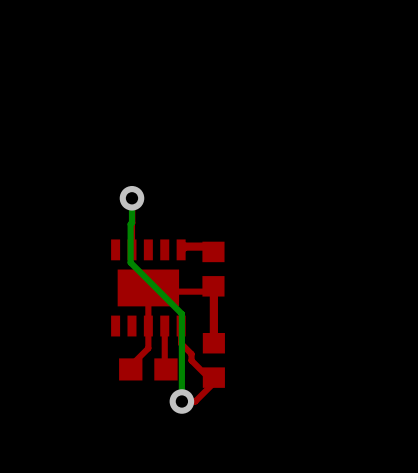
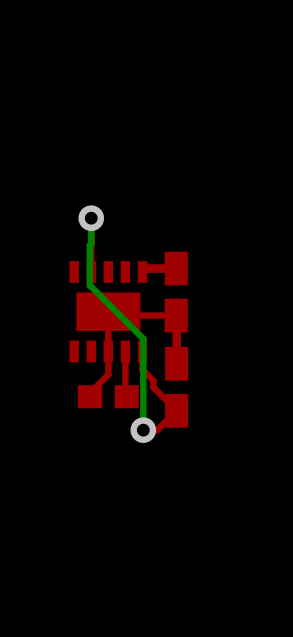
part footprint: [202, 241, 225, 297] -> [164, 251, 188, 333]
part footprint: [202, 332, 225, 388] -> [165, 346, 189, 428]

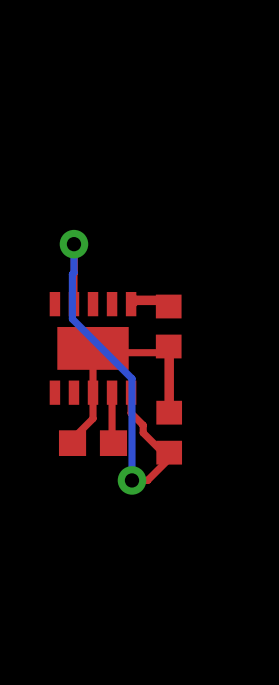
part footprint: [164, 251, 188, 333] -> [155, 294, 182, 359]
part footprint: [165, 346, 189, 428] -> [156, 400, 183, 465]

